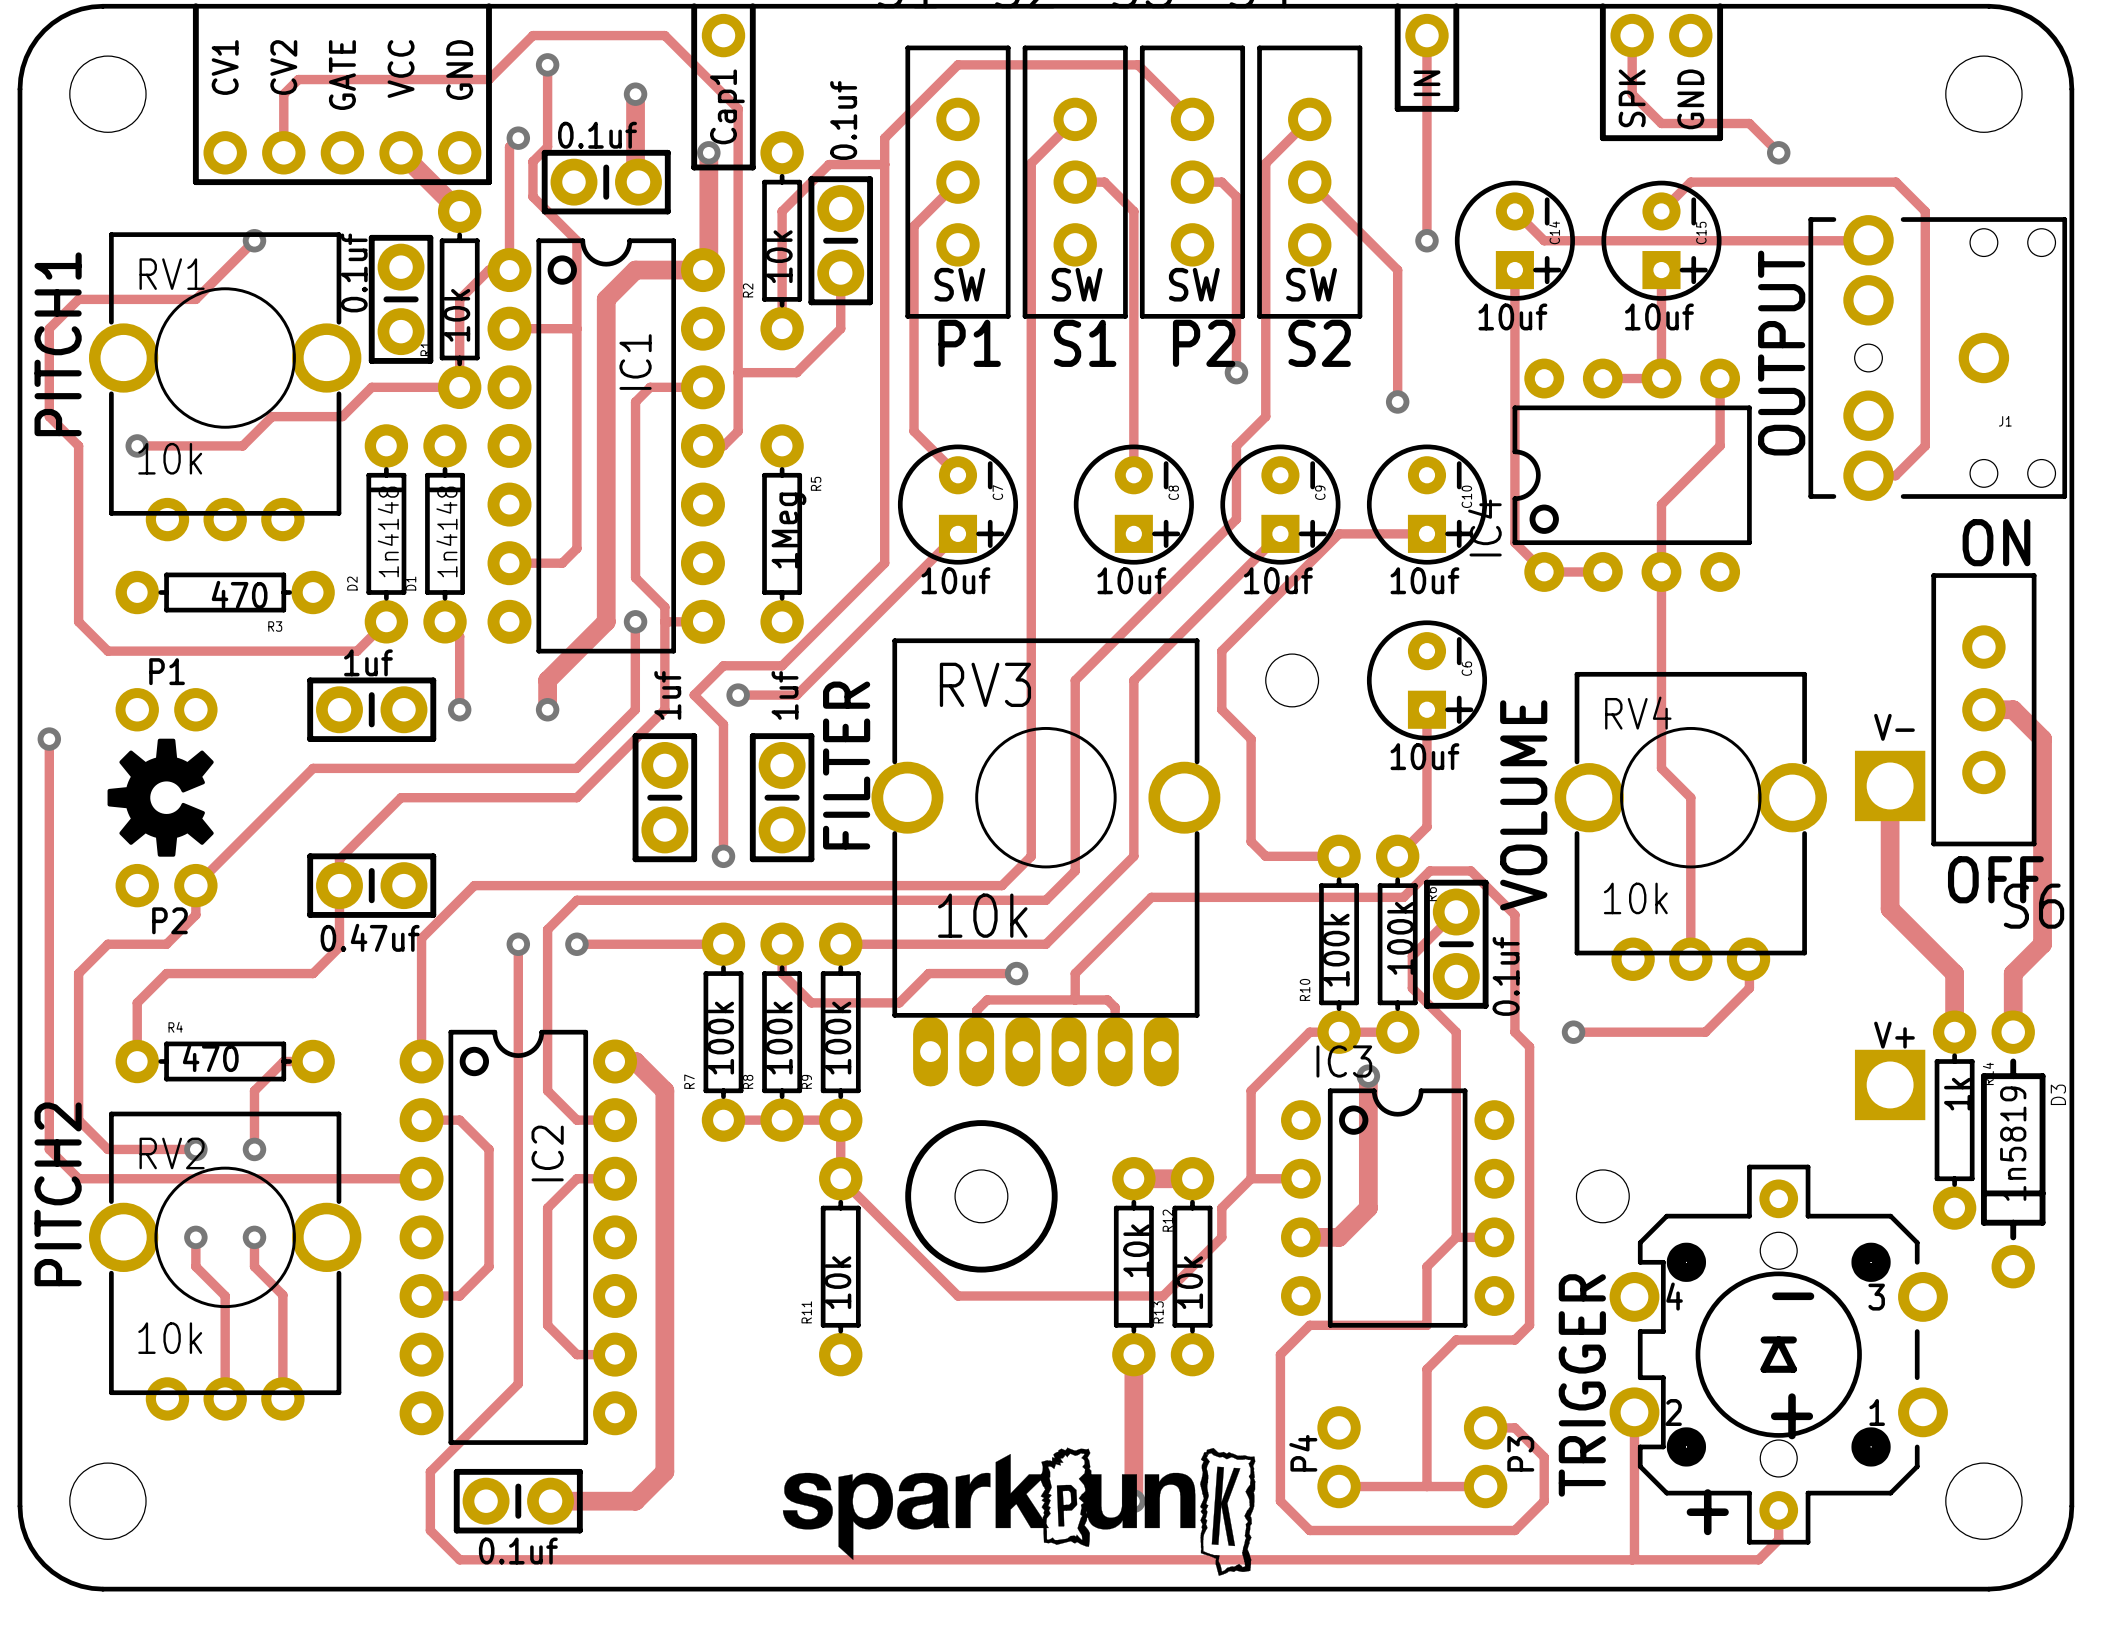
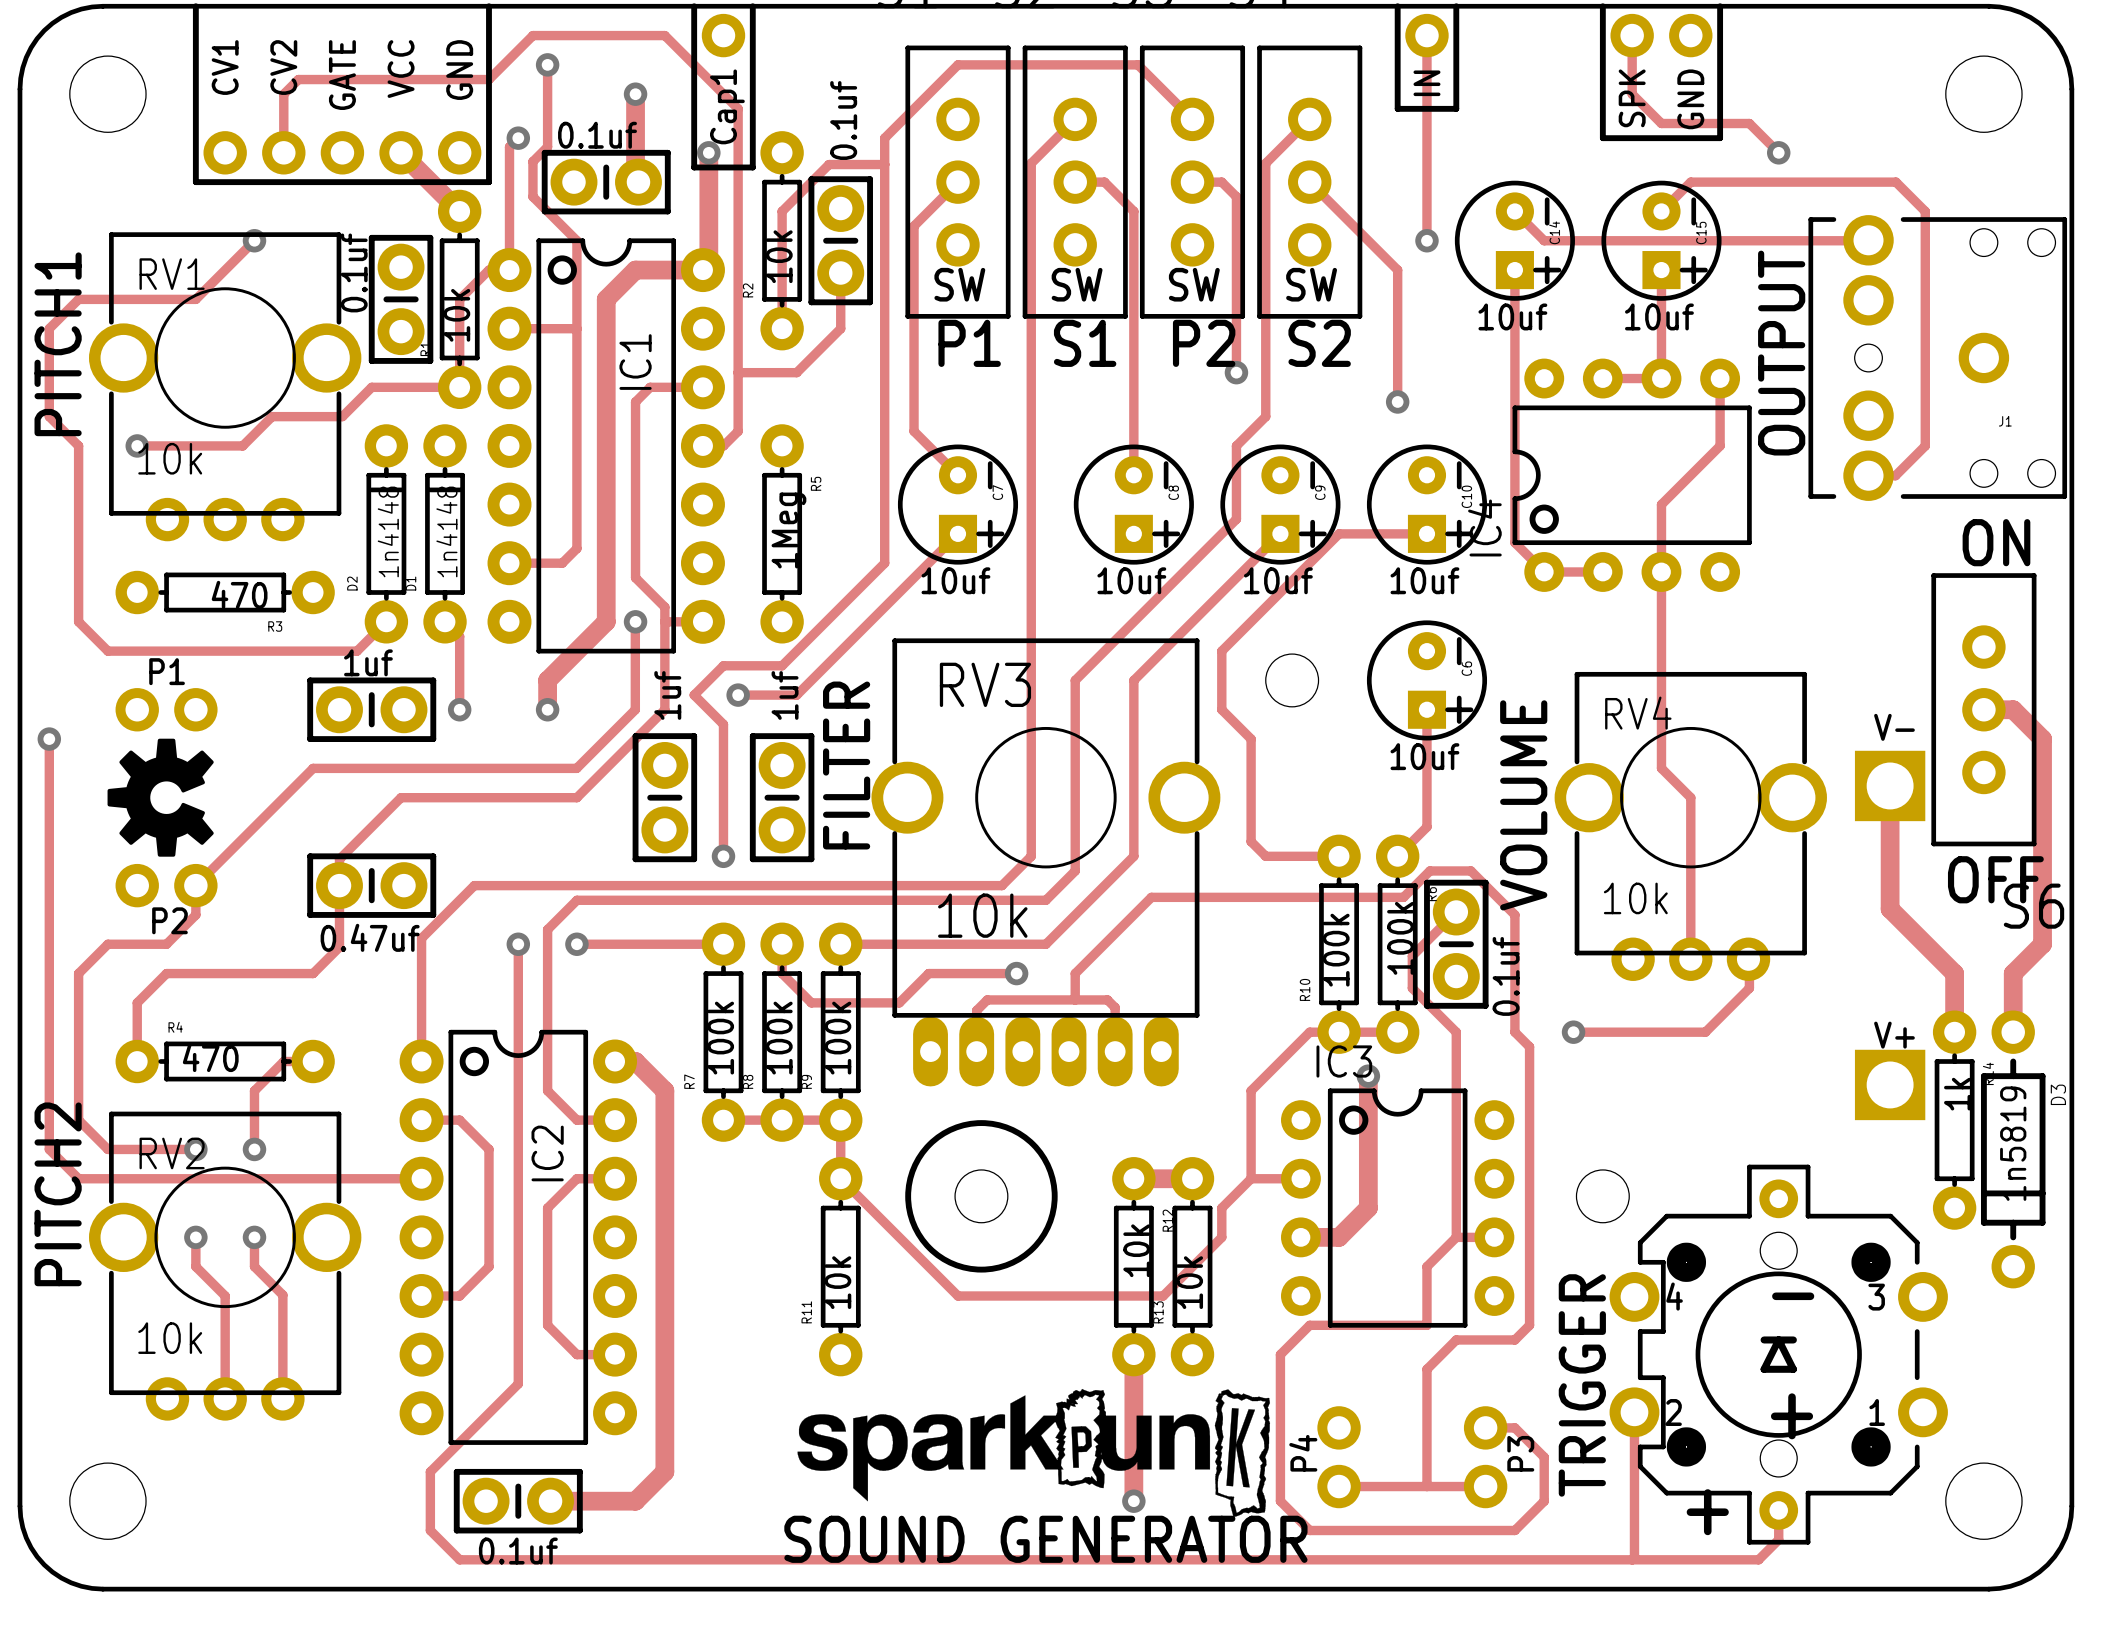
drawing position: (1019, 1511) -> (1033, 1453)
text: none -> SOUND GENERATOR (1045, 1539)

